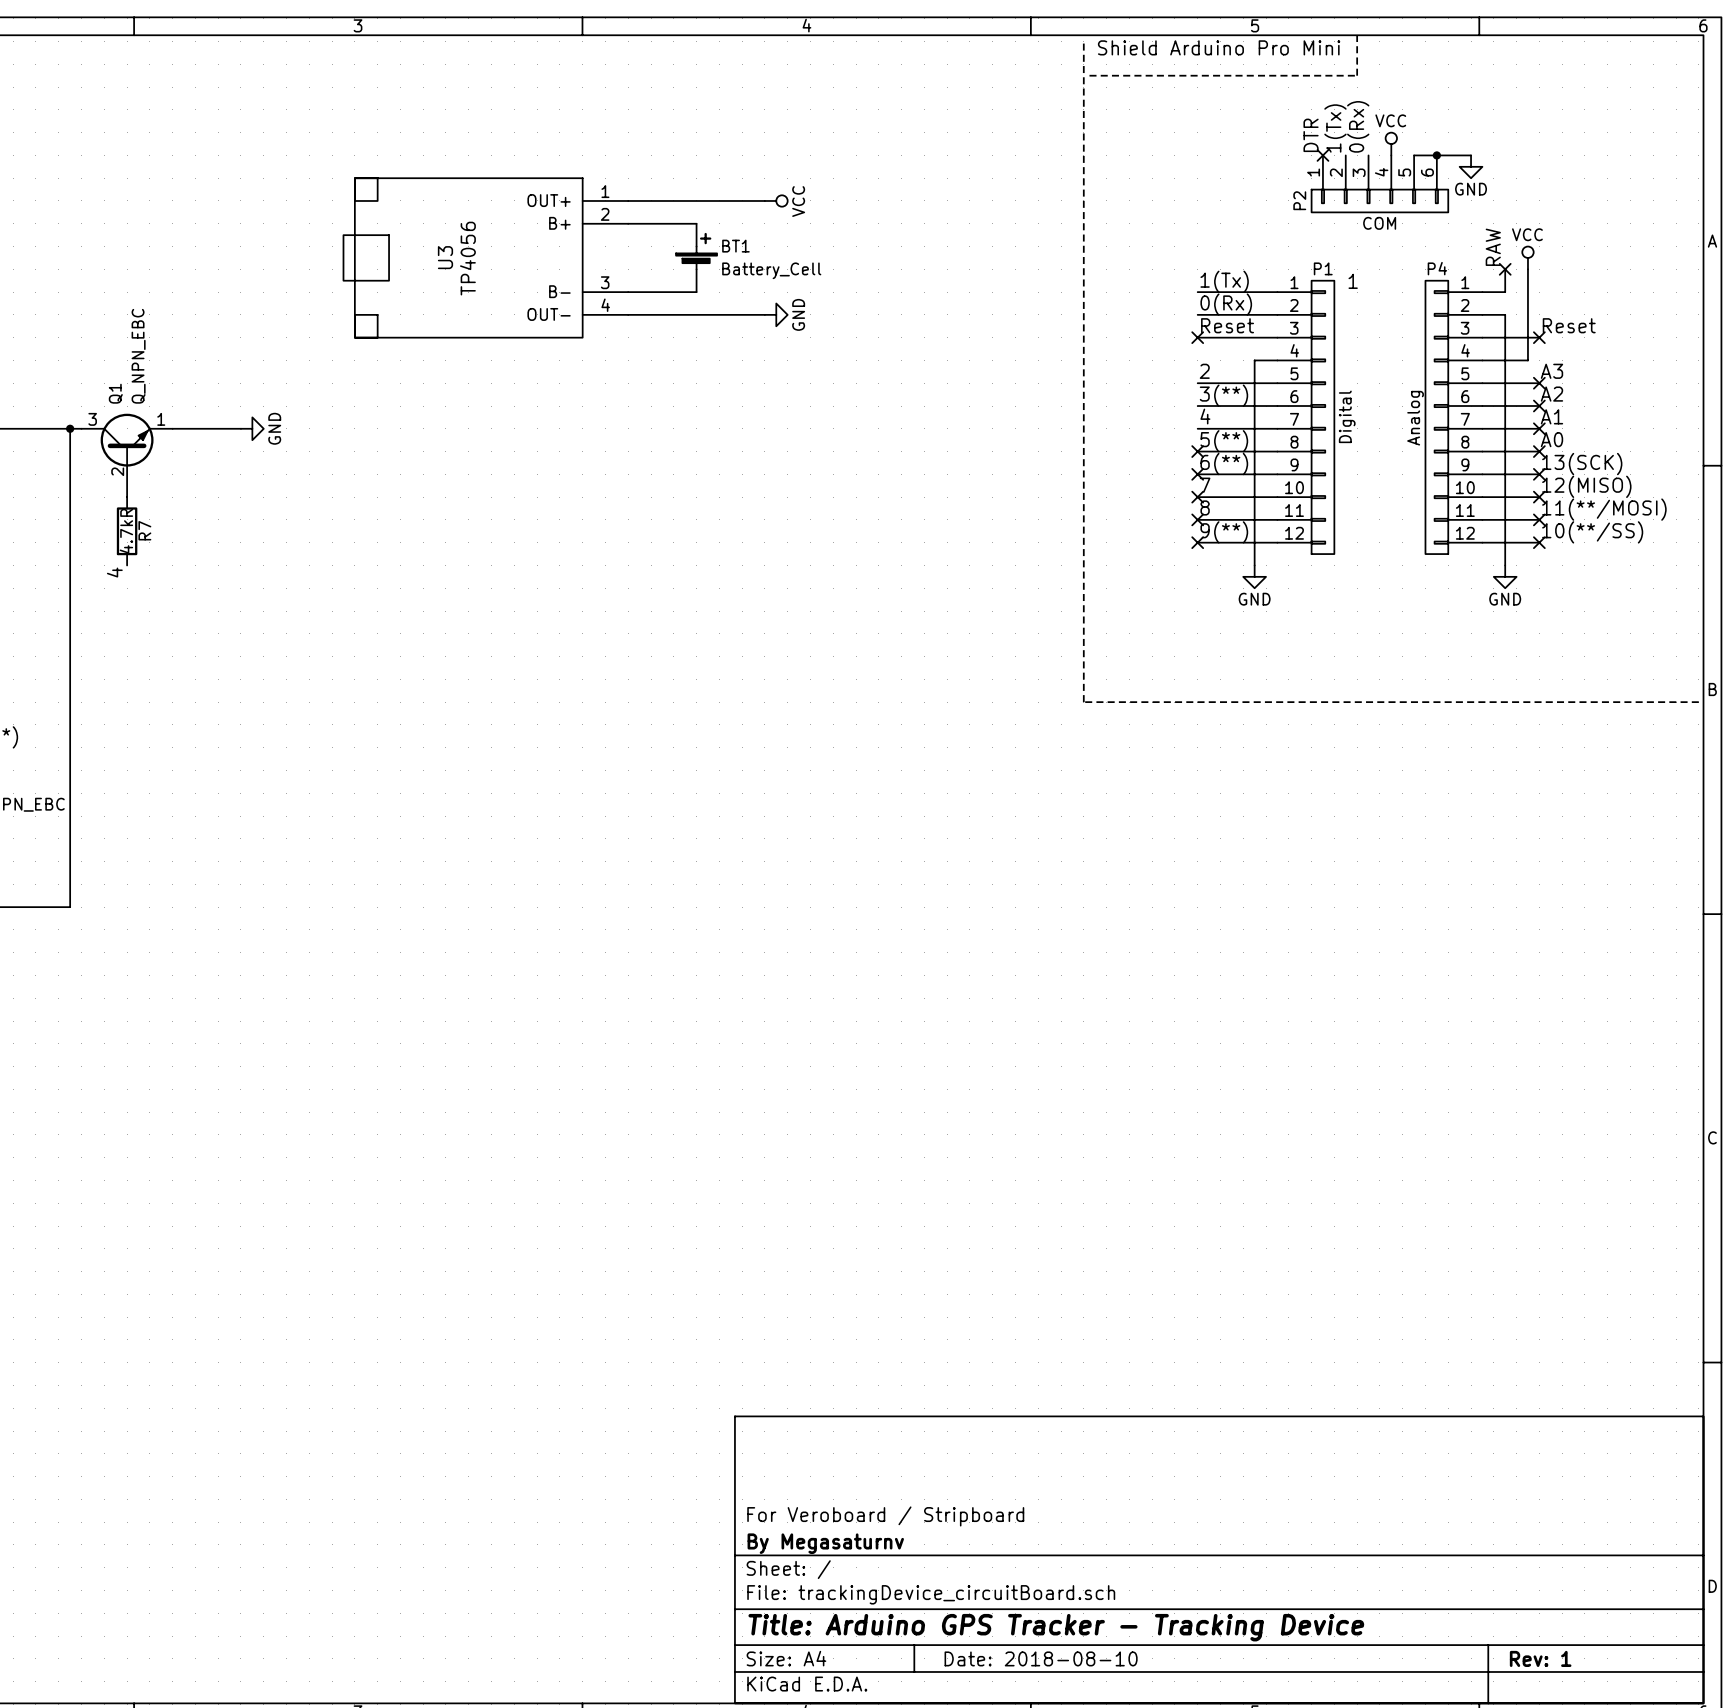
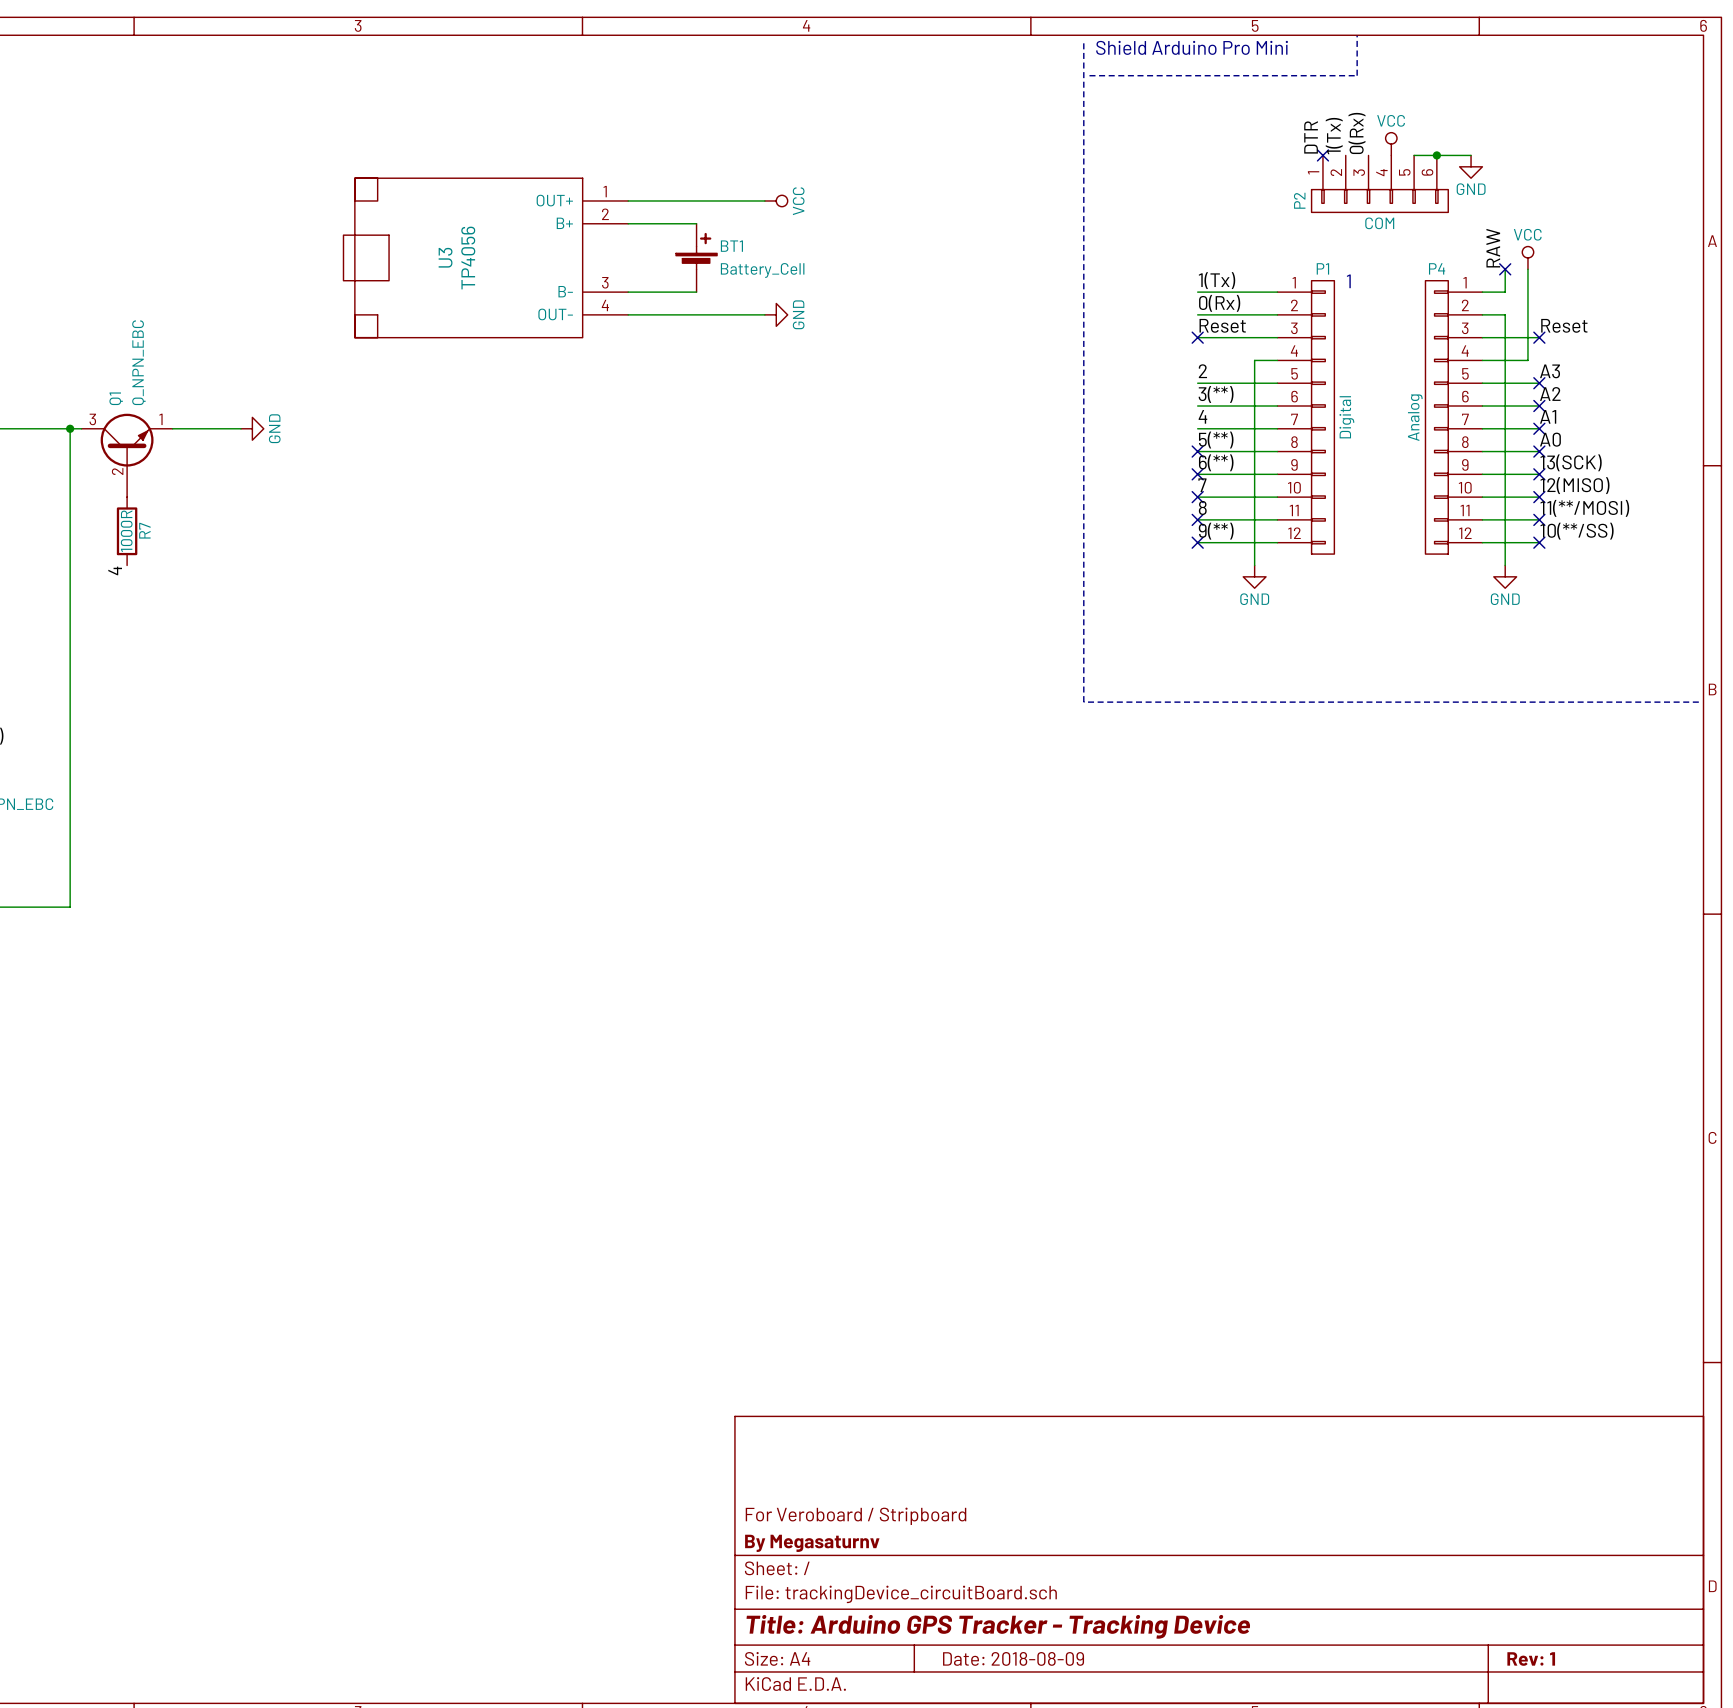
R7 value: 4.7kR (126, 531) -> 1000R (126, 531)
title block: Date: 2018-08-10 (1041, 1658) -> Date: 2018-08-09 (1013, 1658)

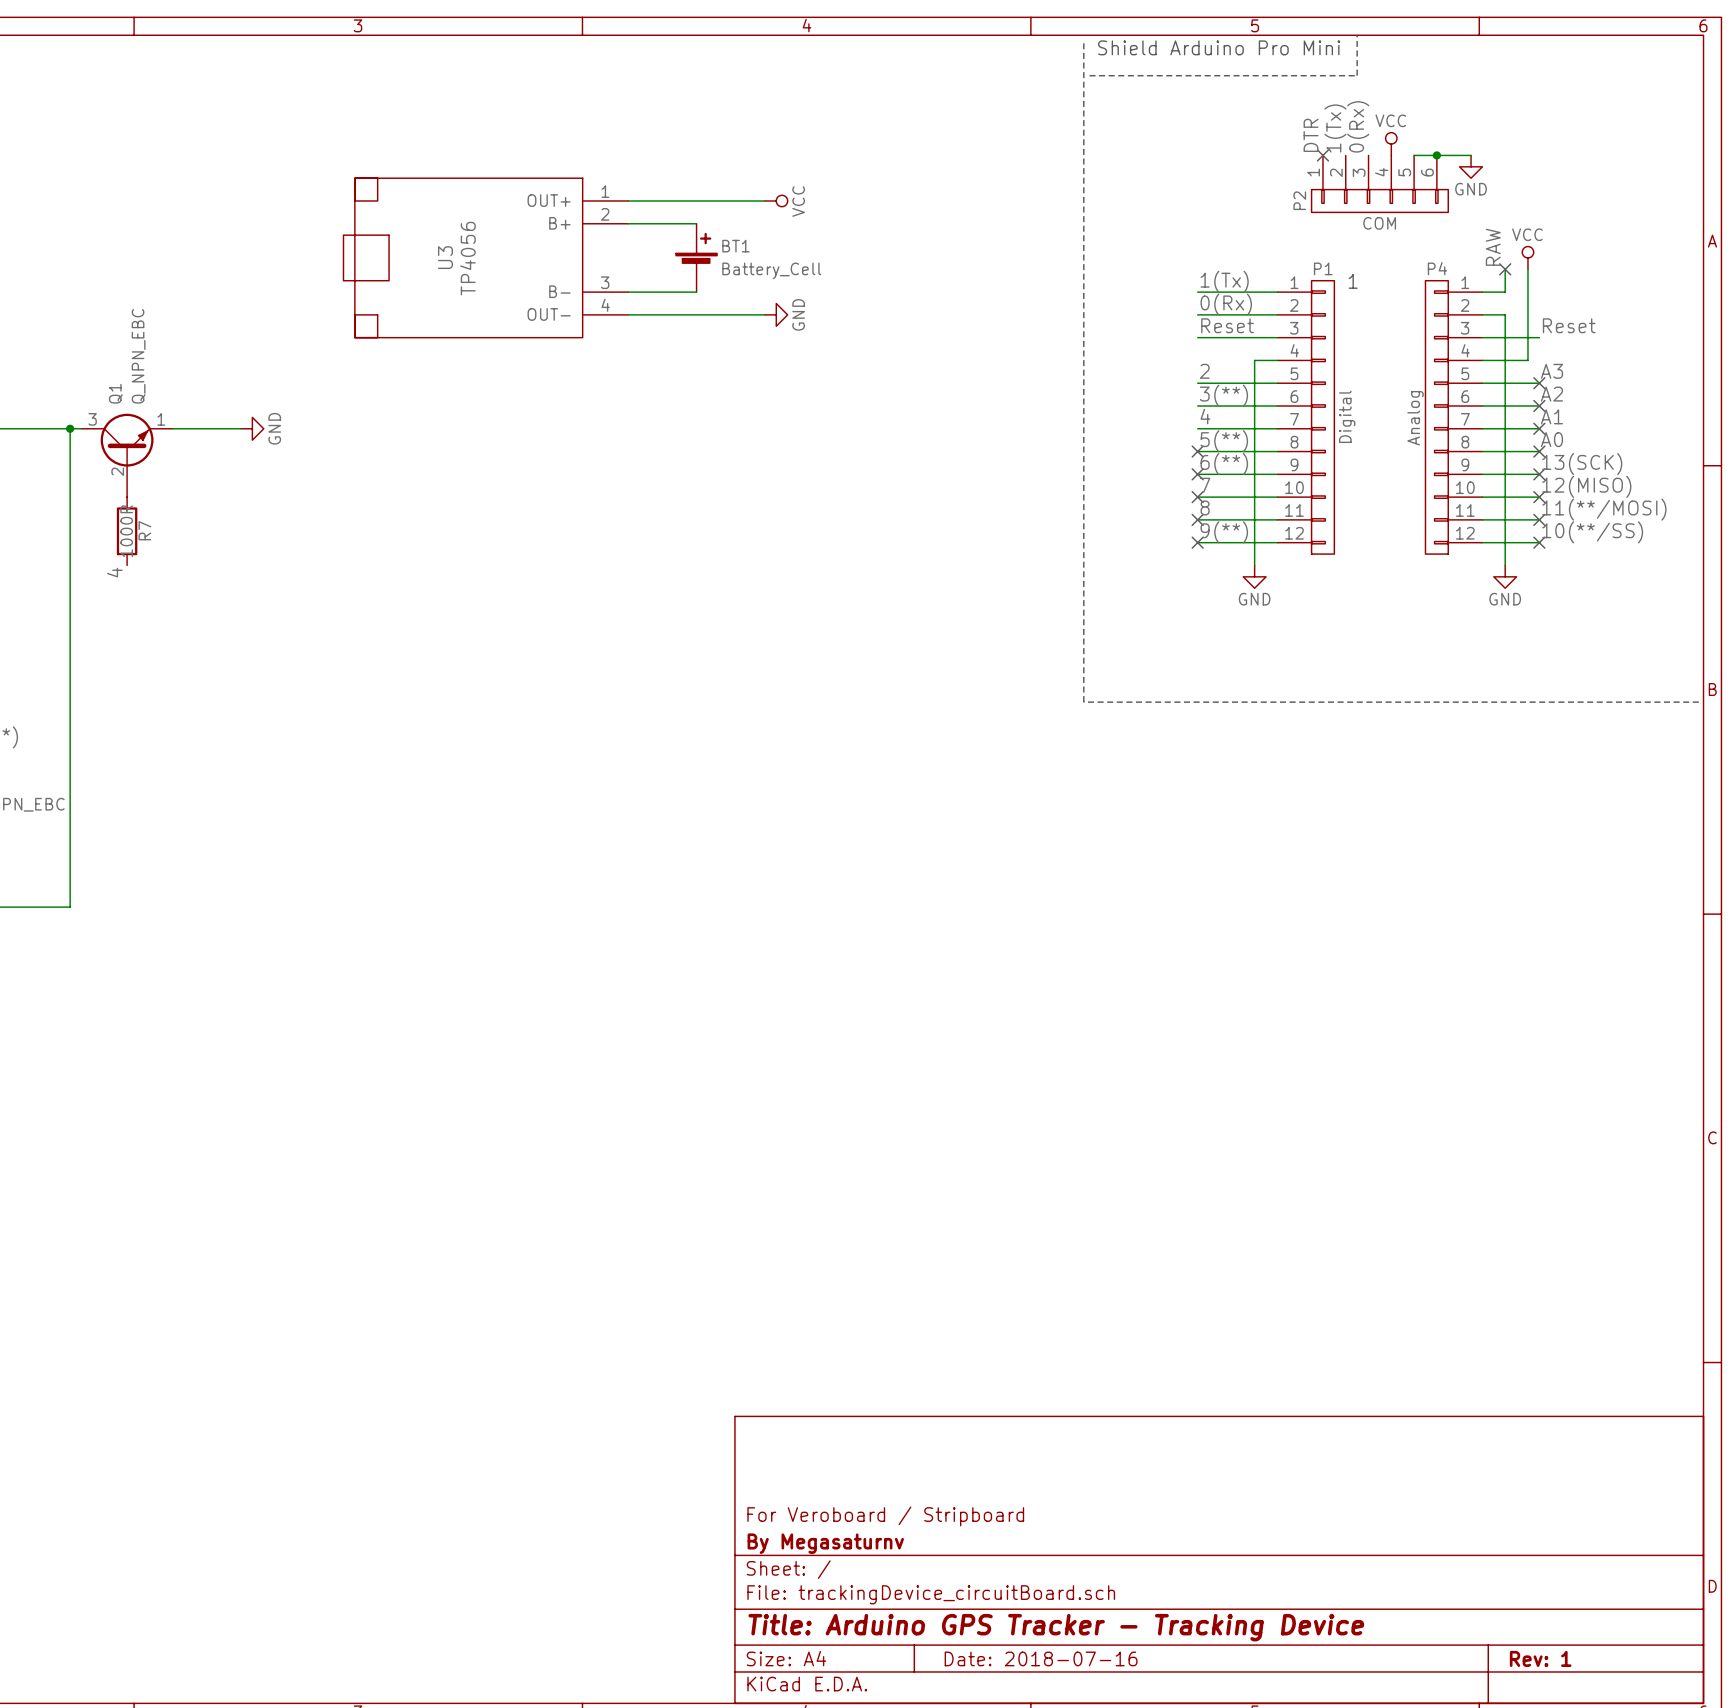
no-connect mark: (1197, 337) -> none
no-connect mark: (1539, 337) -> none
title block: Date: 2018-08-09 (1013, 1658) -> Date: 2018-07-16 (1041, 1658)

